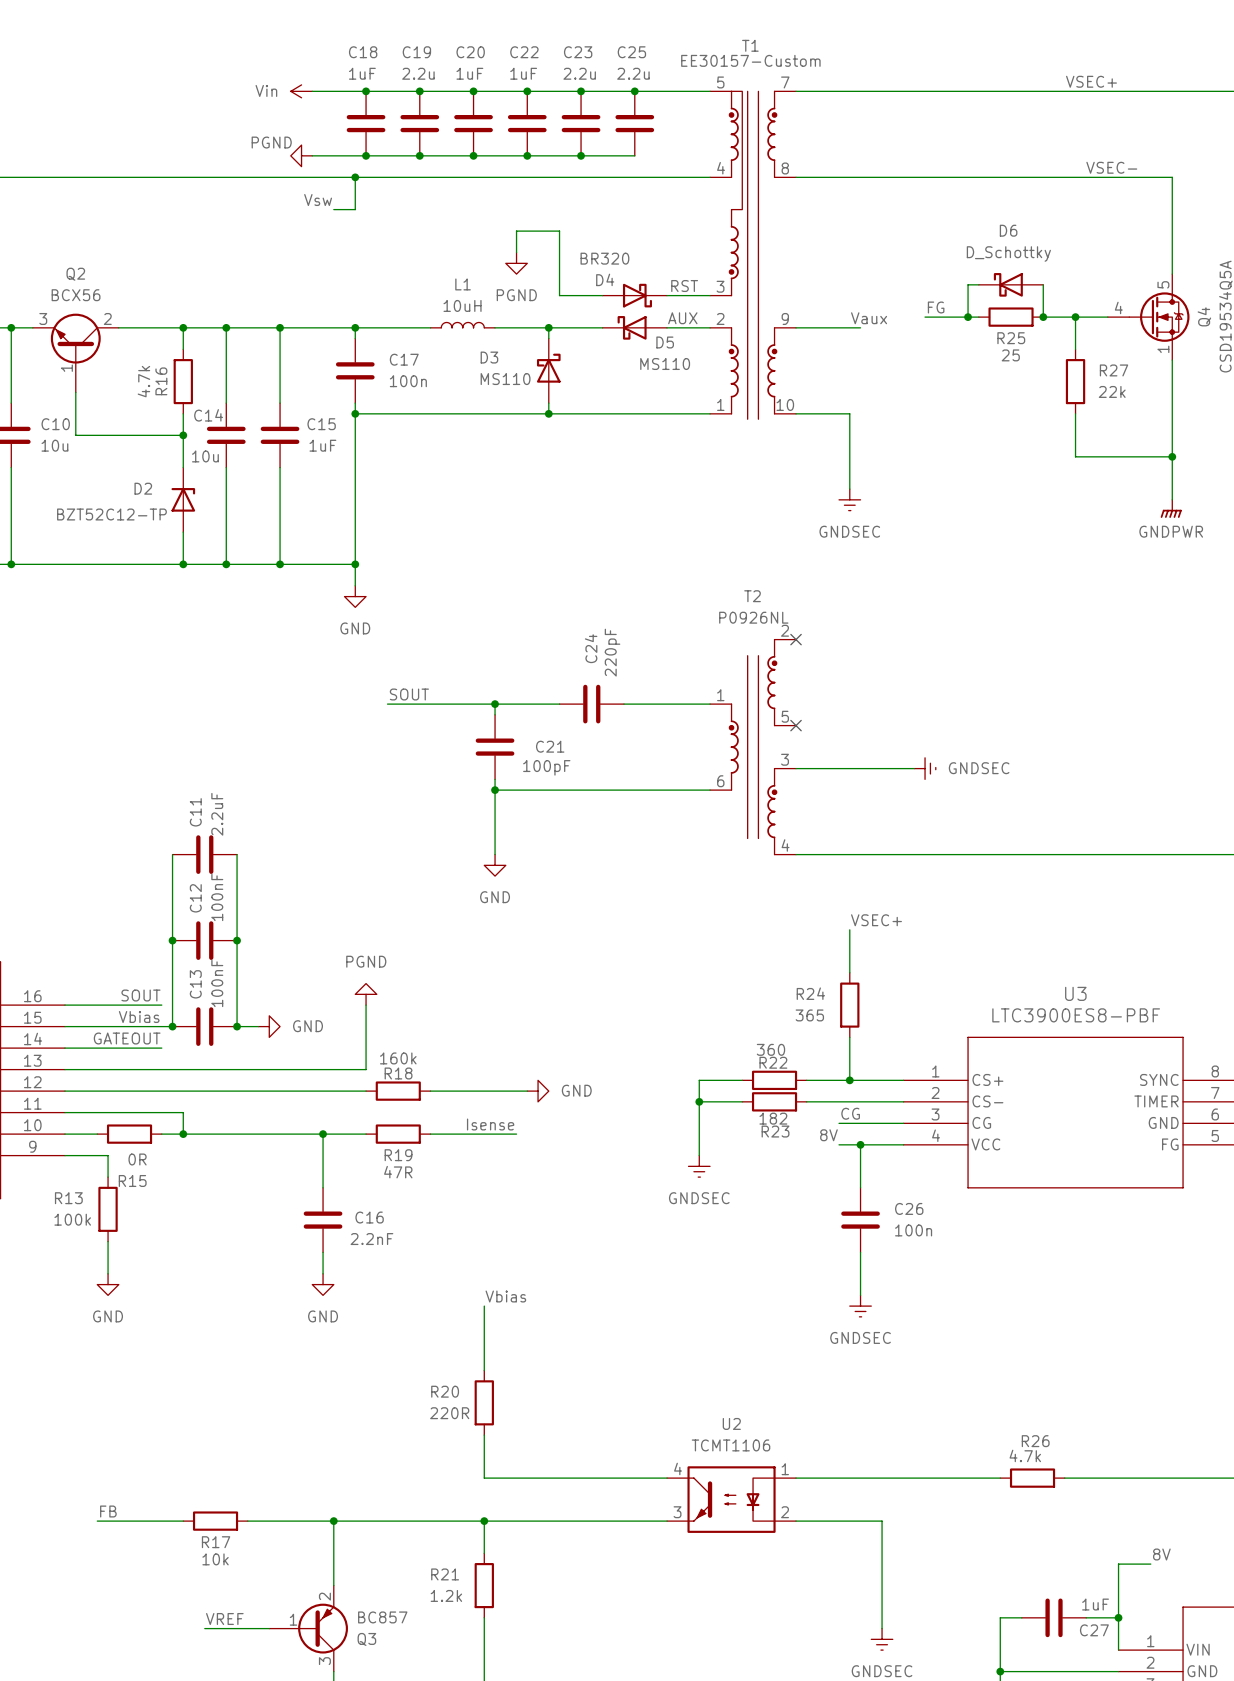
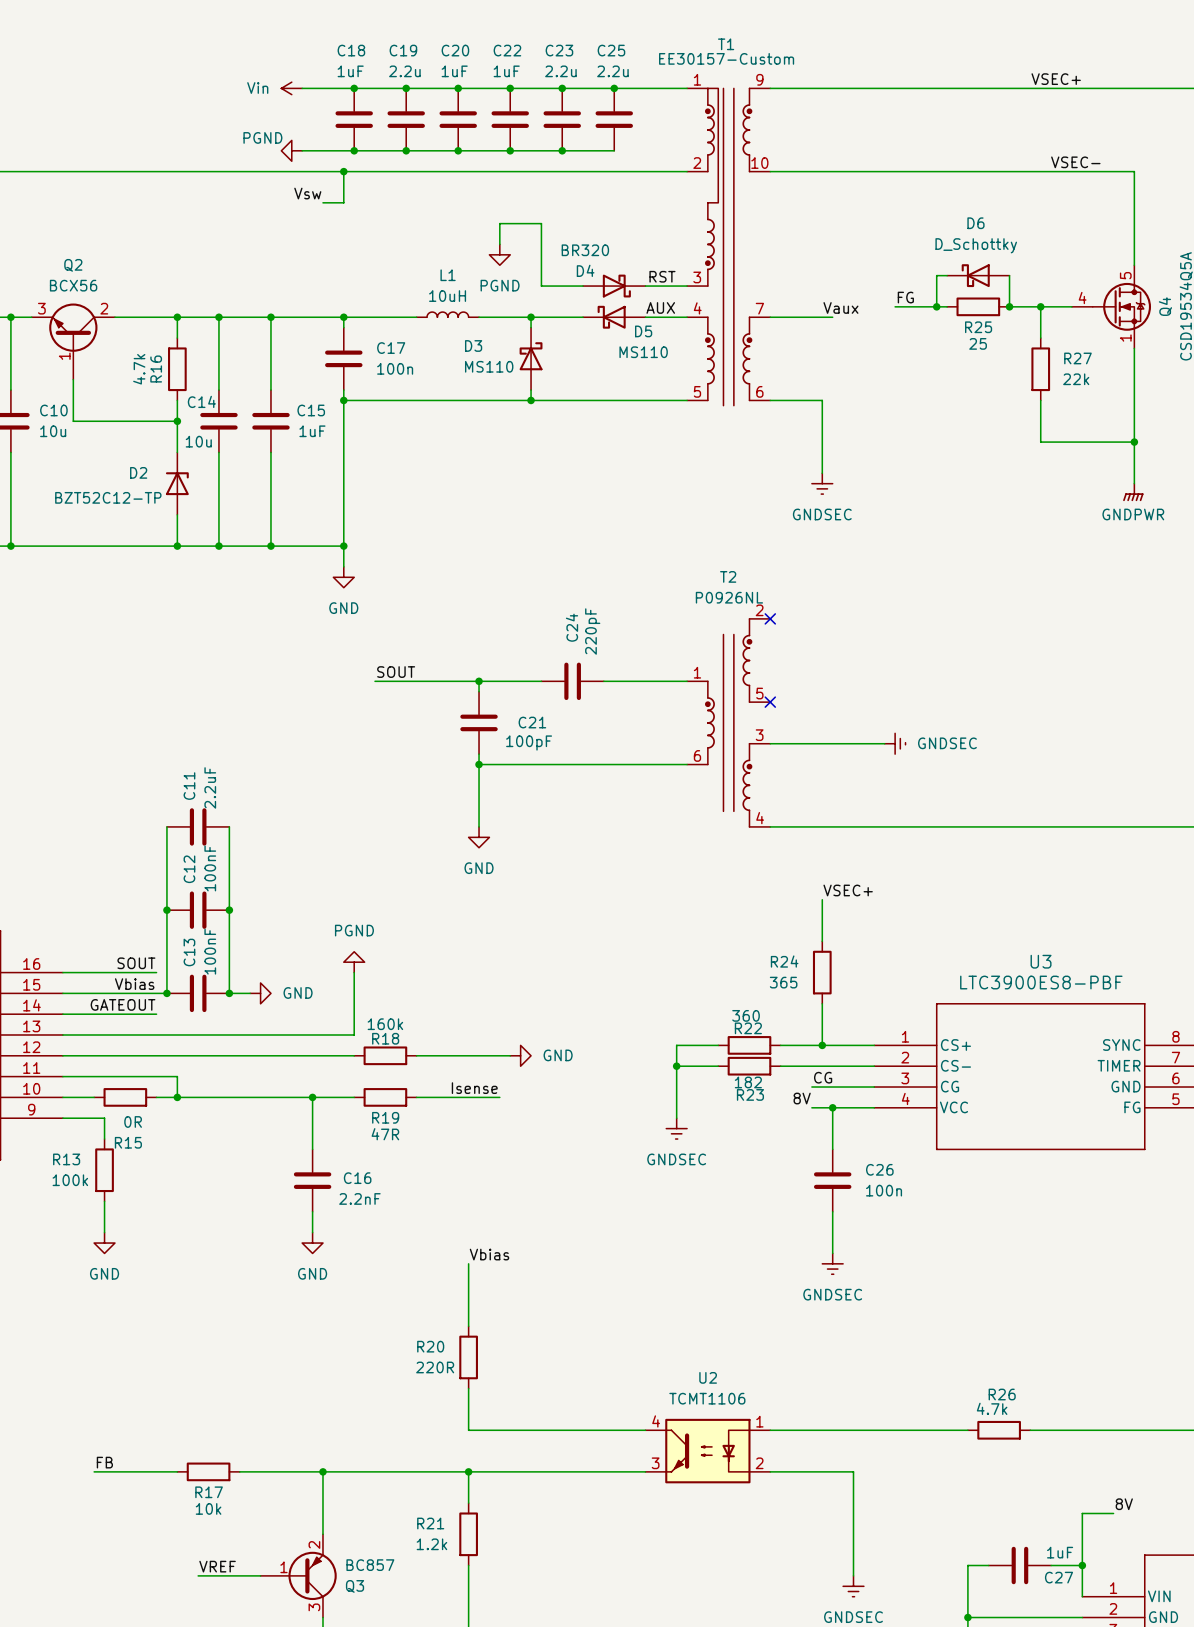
T1 pin number: 5 (720, 82) -> 1 (697, 79)
T1 pin number: 7 (785, 82) -> 9 (759, 79)
T1 pin number: 4 (721, 168) -> 2 (697, 163)
T1 pin number: 8 (785, 168) -> 10 (759, 163)
T1 pin number: 2 (720, 318) -> 4 (697, 308)
T1 pin number: 9 (785, 318) -> 7 (759, 308)
T1 pin number: 1 (720, 404) -> 5 (697, 391)
T1 pin number: 10 (785, 404) -> 6 (759, 391)

